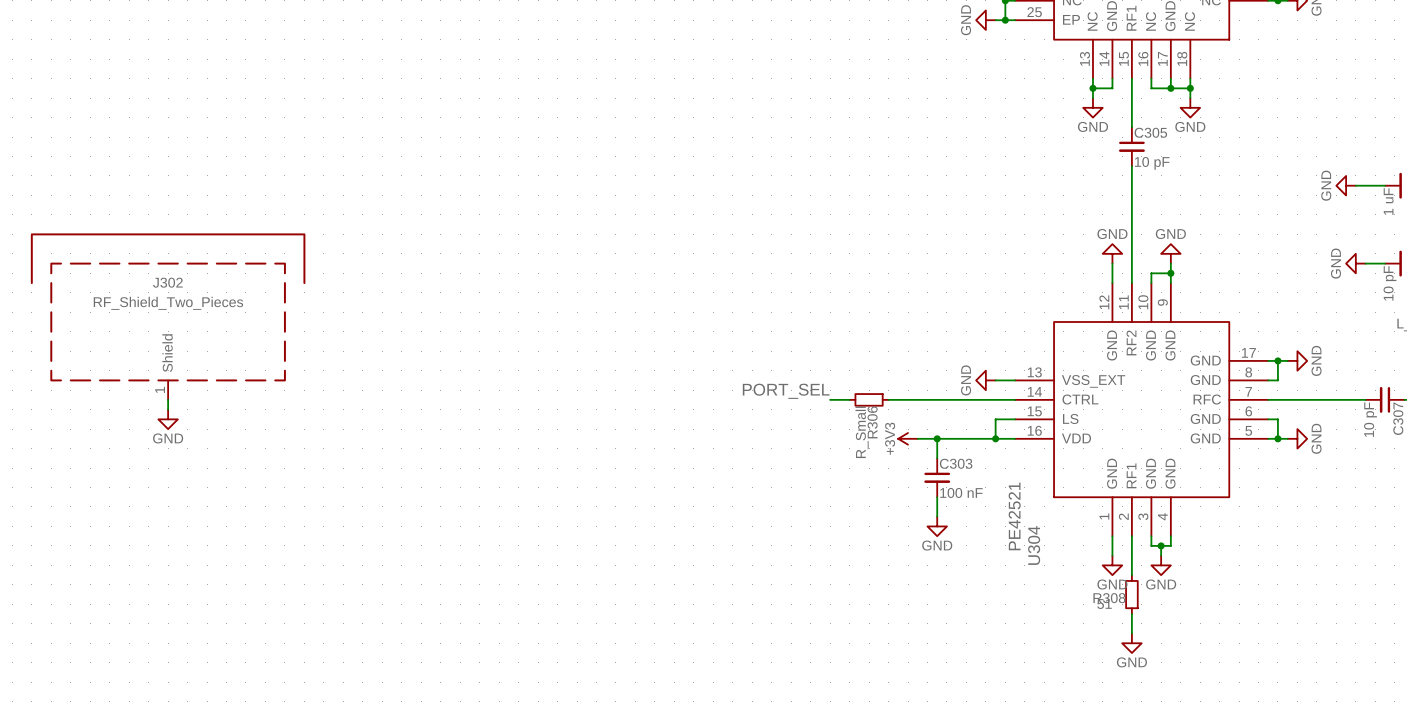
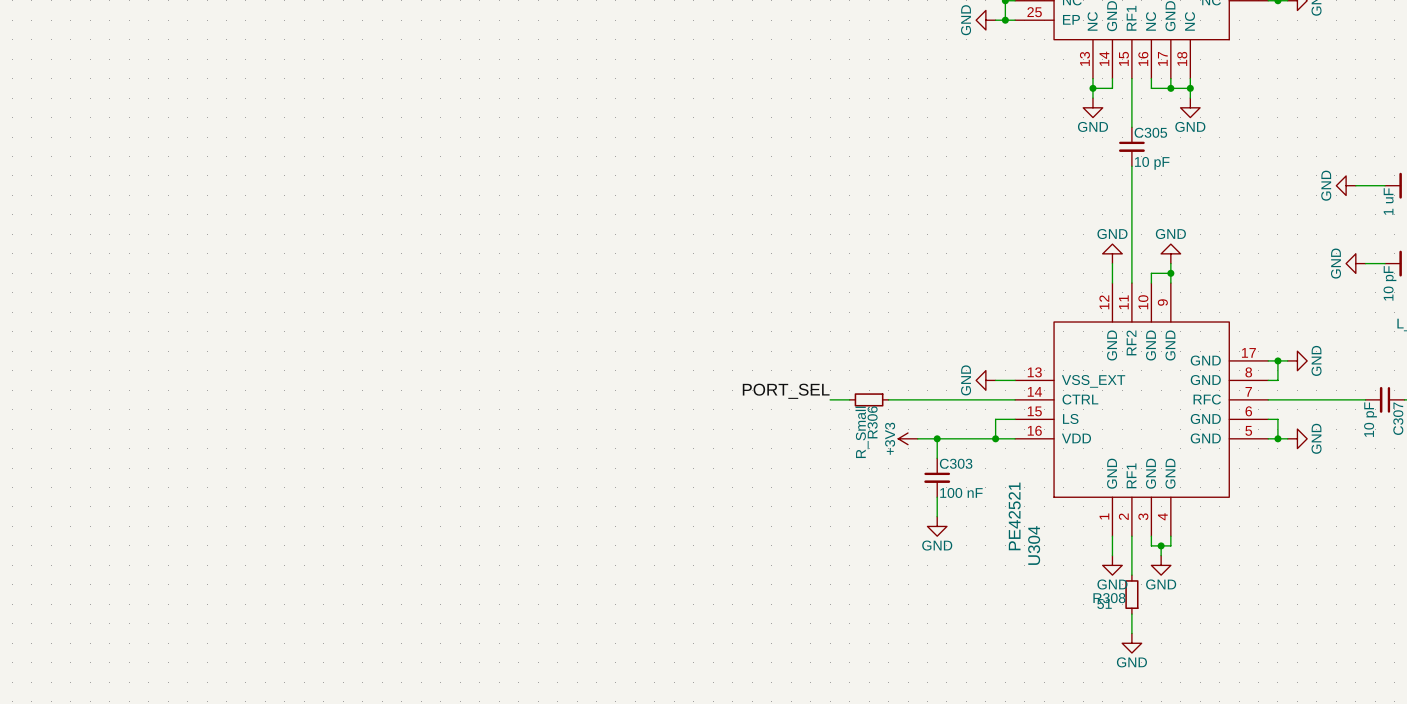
J302: RF_Shield_Two_Pieces (168, 316) -> none
wire: (168, 399) (168, 409) -> none
power symbol: GND (168, 419) -> none

